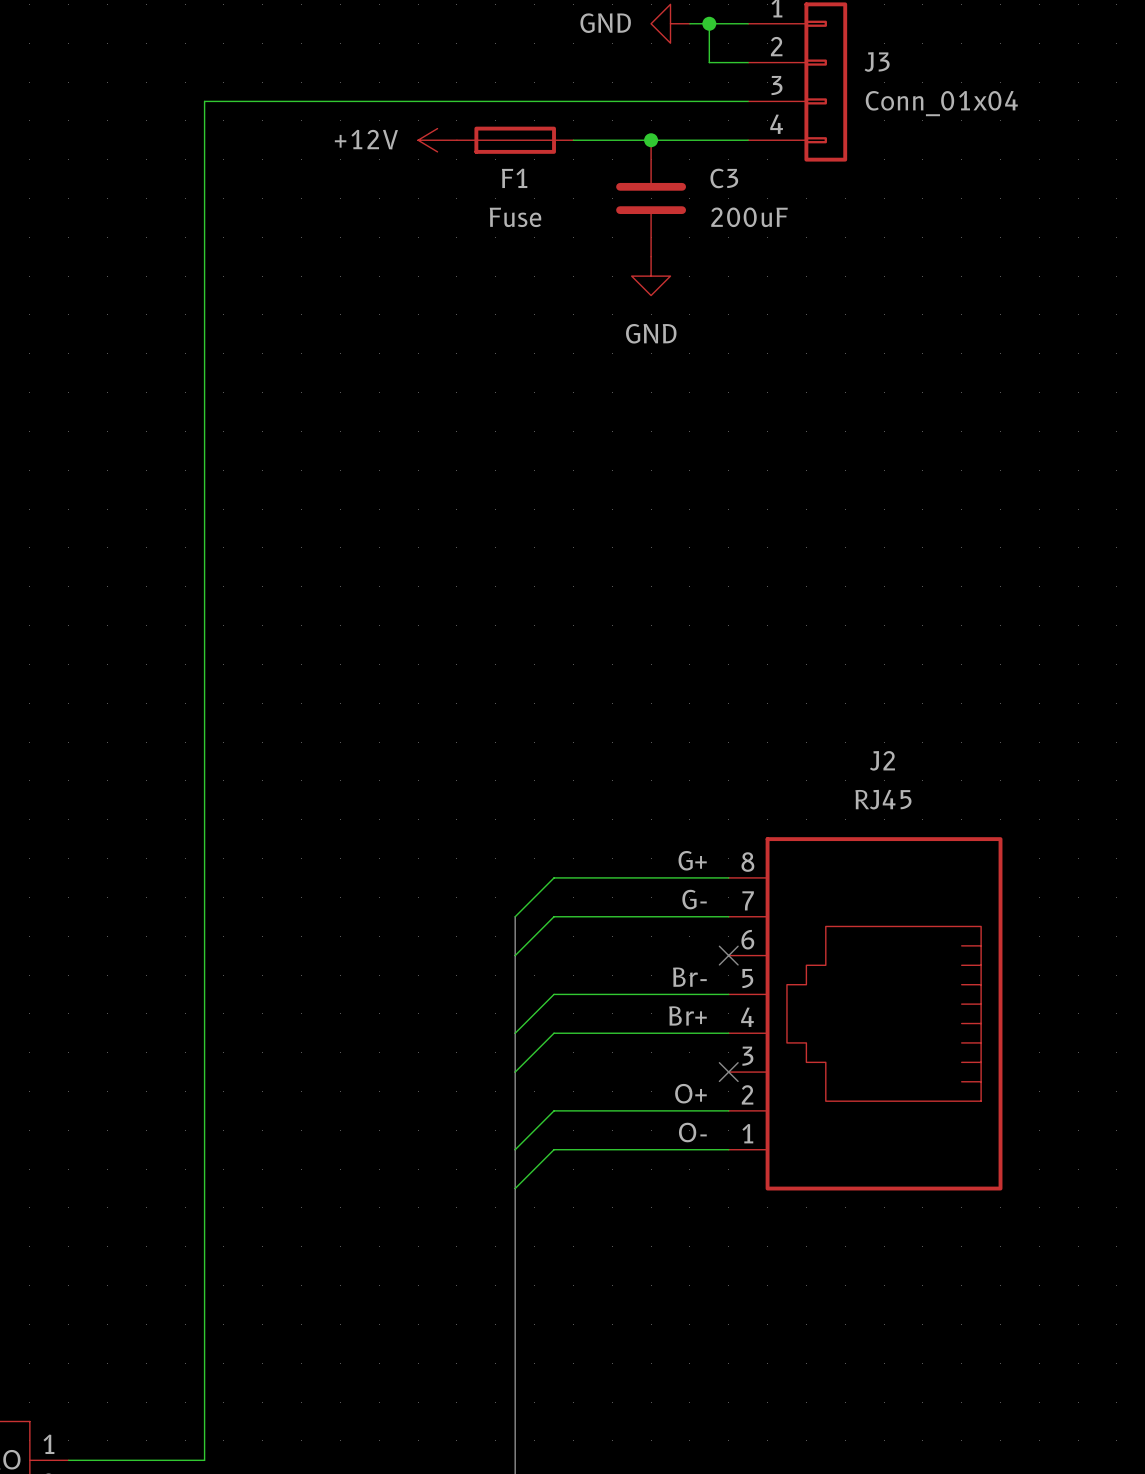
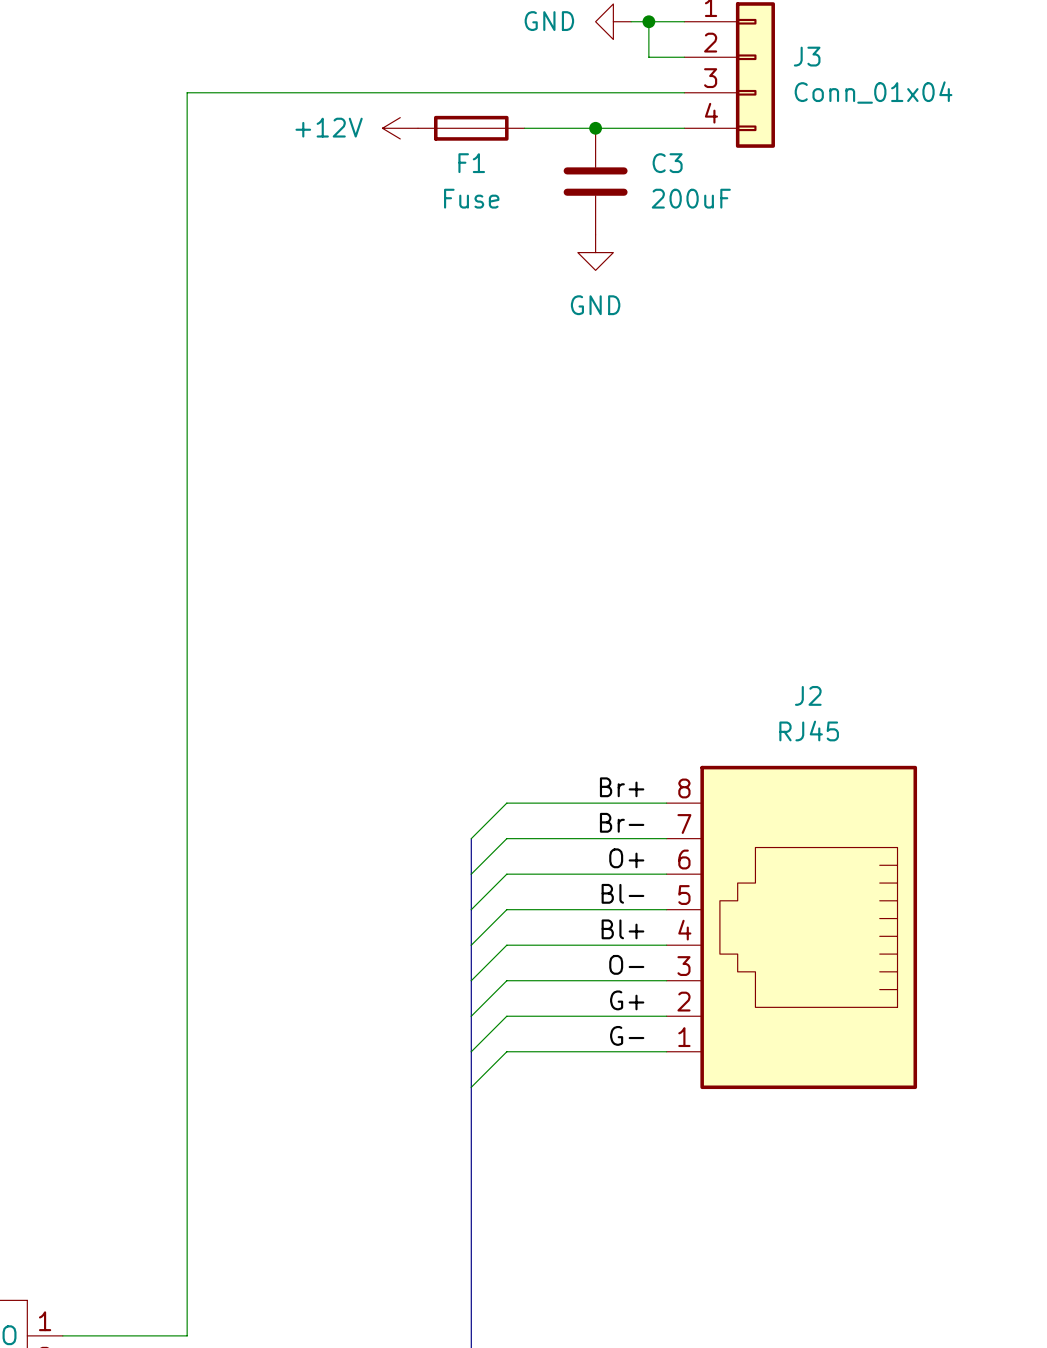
label: G+ (692, 860) -> Br+ (622, 787)
label: G- (694, 899) -> Br- (622, 822)
label: none -> O+ (626, 858)
wire: none -> (666, 874) (506, 874) (471, 909)
no-connect mark: (728, 955) -> none
label: Br- (689, 977) -> Bl- (622, 893)
label: Br+ (687, 1015) -> Bl+ (622, 929)
label: none -> O- (626, 964)
wire: none -> (666, 980) (506, 980) (471, 1016)
no-connect mark: (728, 1072) -> none
label: O+ (690, 1093) -> G+ (627, 1000)
label: O- (692, 1132) -> G- (627, 1035)

